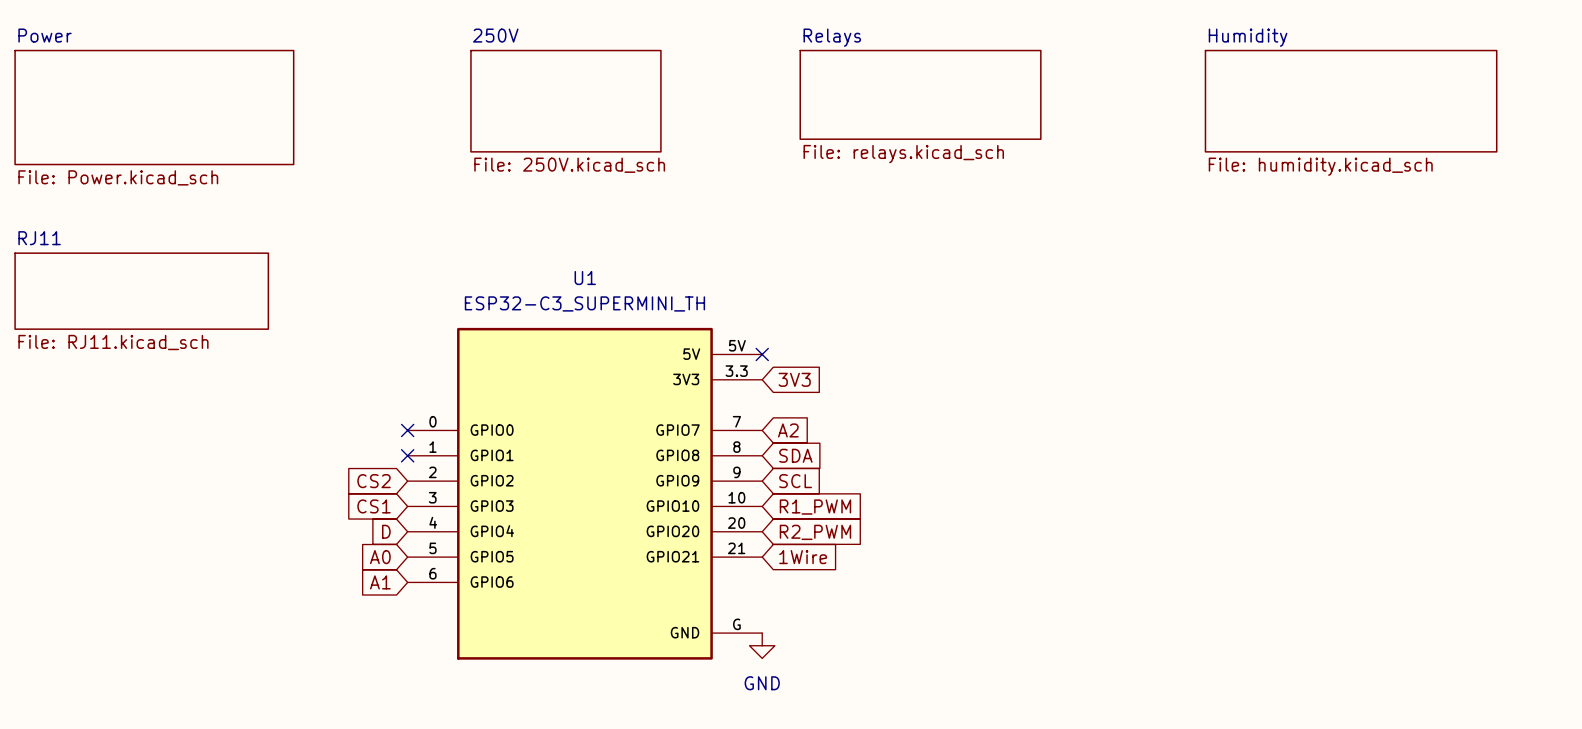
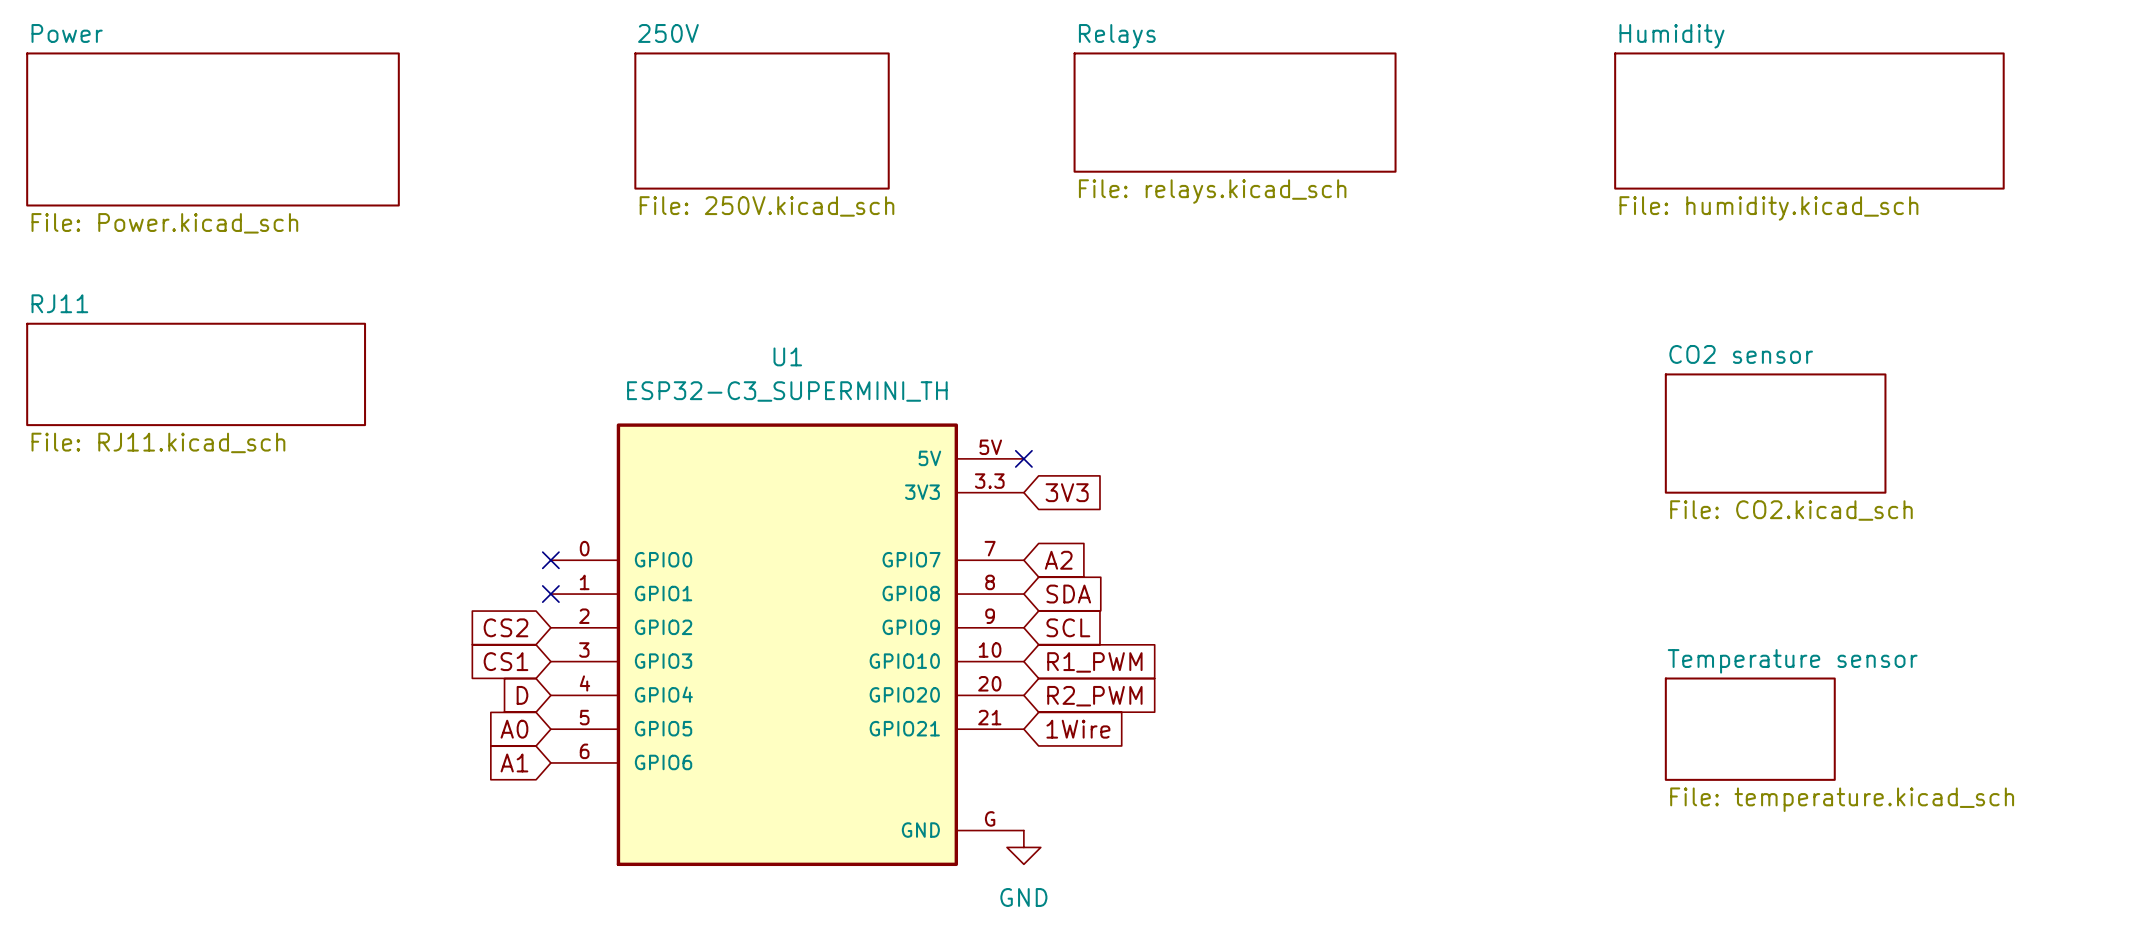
sheet CO2 sensor: none -> File: CO2.kicad_sch (1775, 433)
sheet Temperature sensor: none -> File: temperature.kicad_sch (1750, 729)

